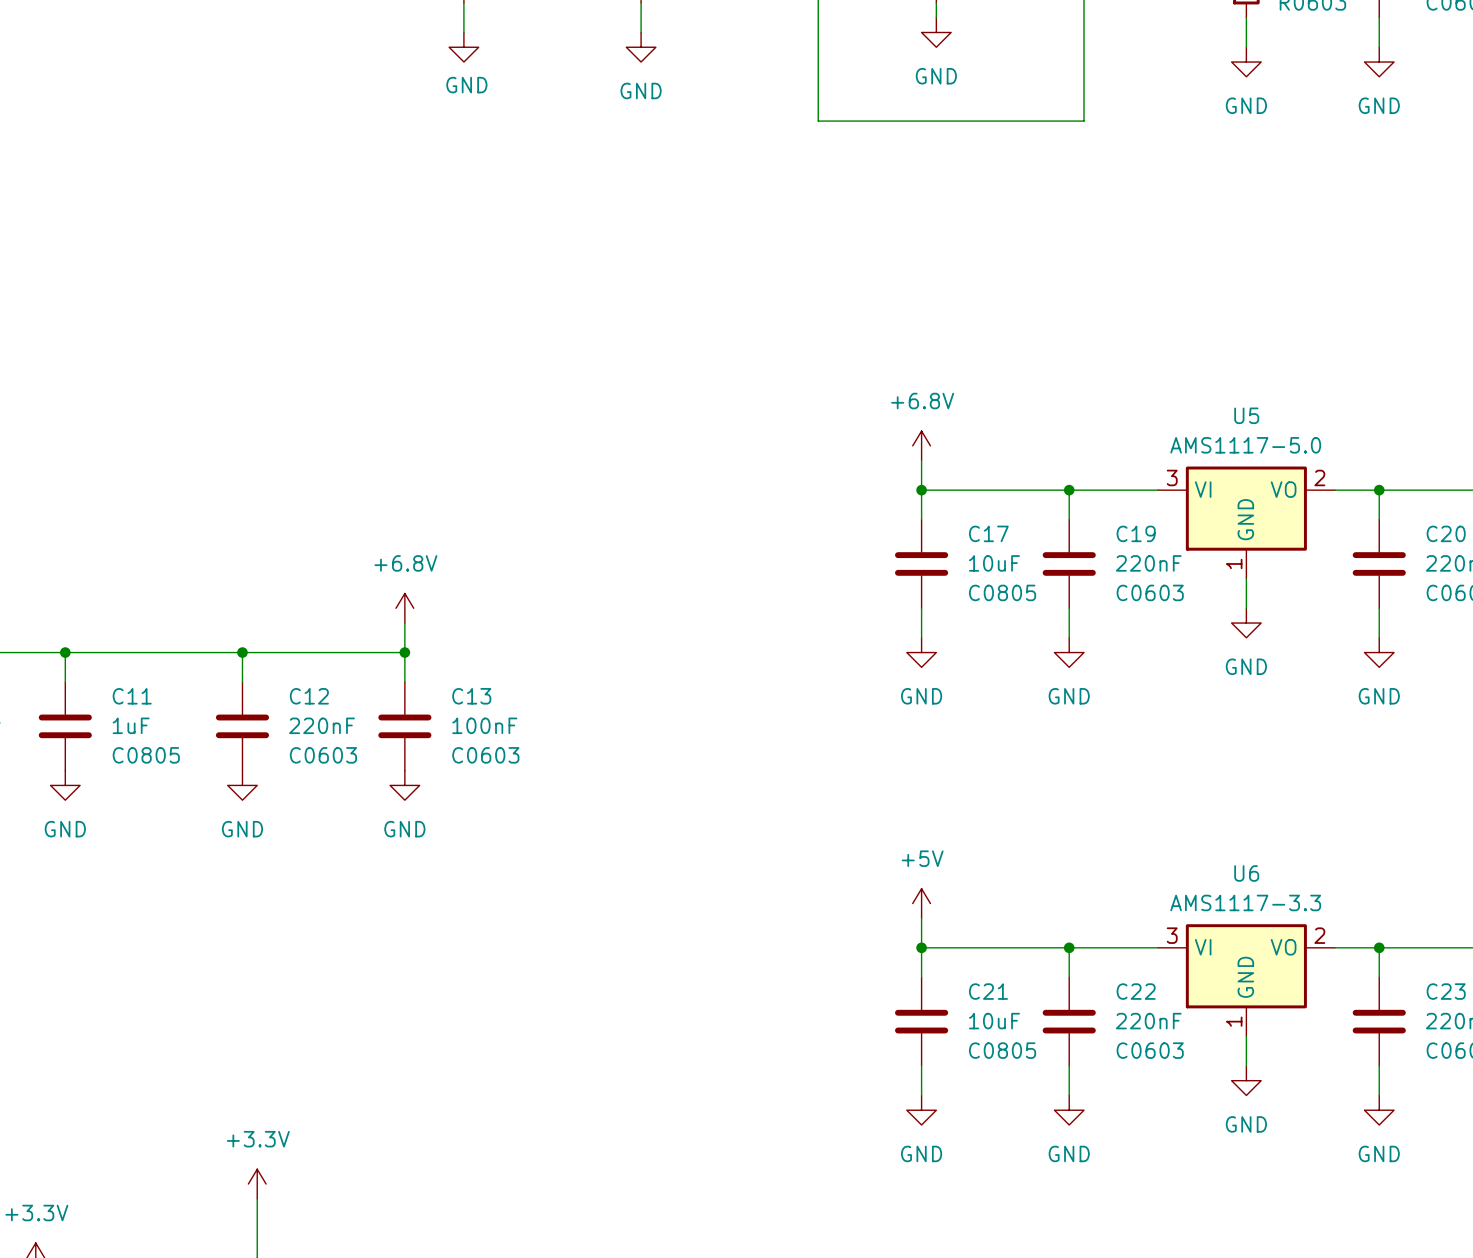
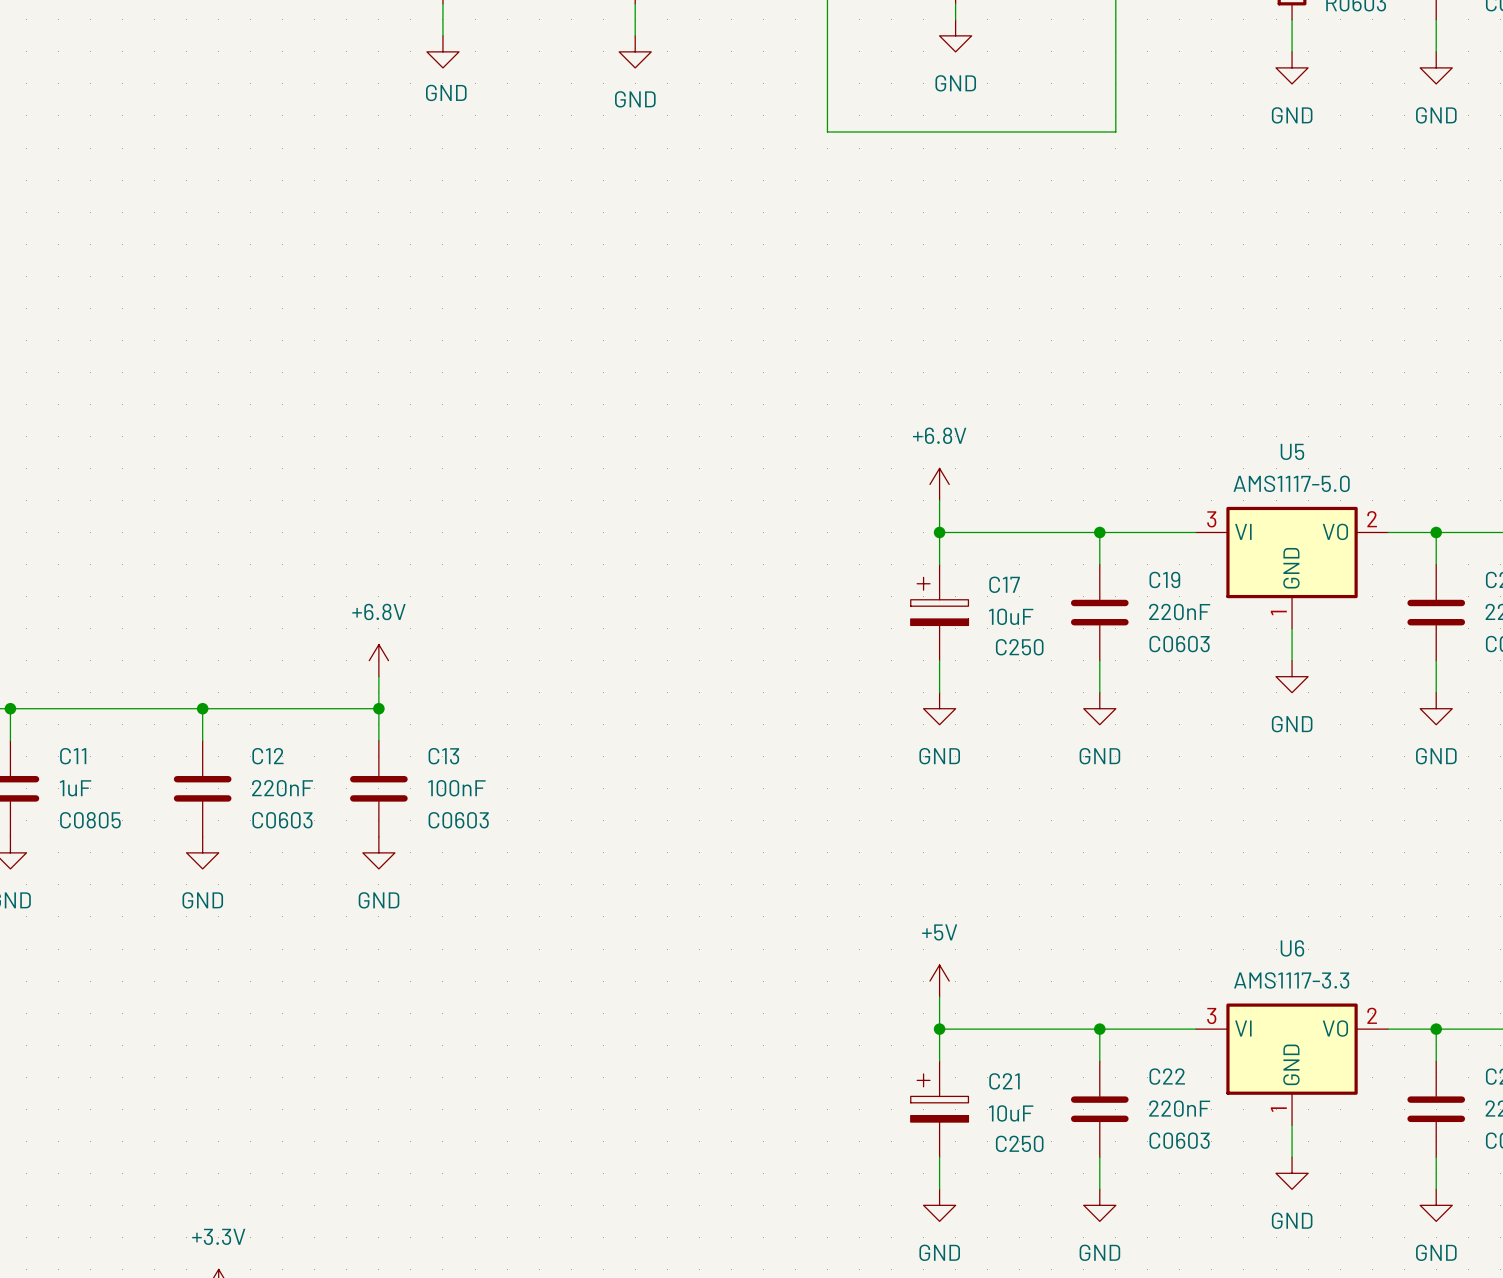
C17 symbol: [895, 519, 949, 609] -> [910, 564, 969, 661]
C17 text: C0805 (1002, 592) -> C250 (1019, 647)
C21 symbol: [895, 977, 949, 1066] -> [910, 1061, 969, 1158]
C21 text: C0805 (1002, 1050) -> C250 (1019, 1143)

